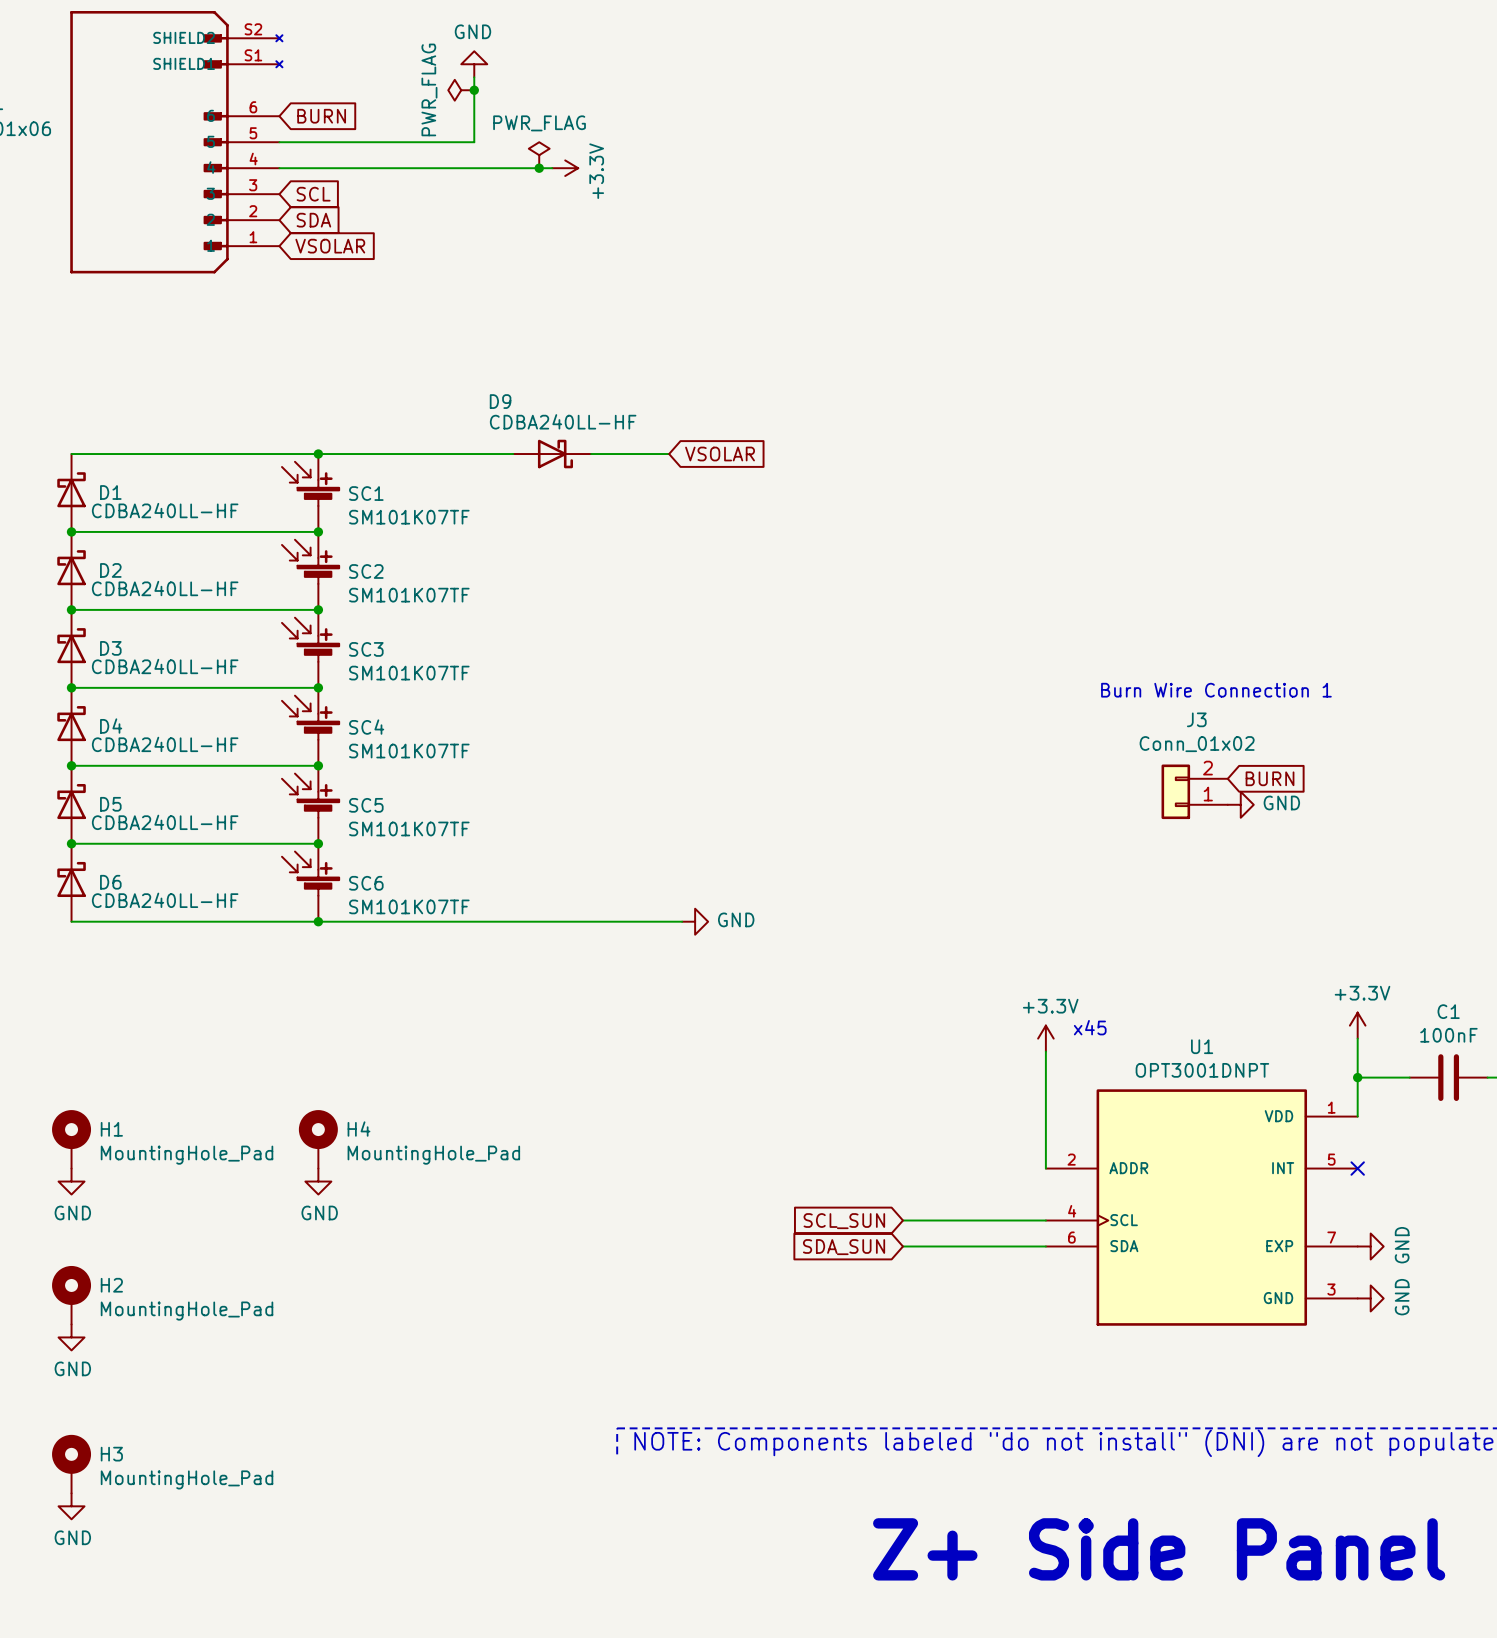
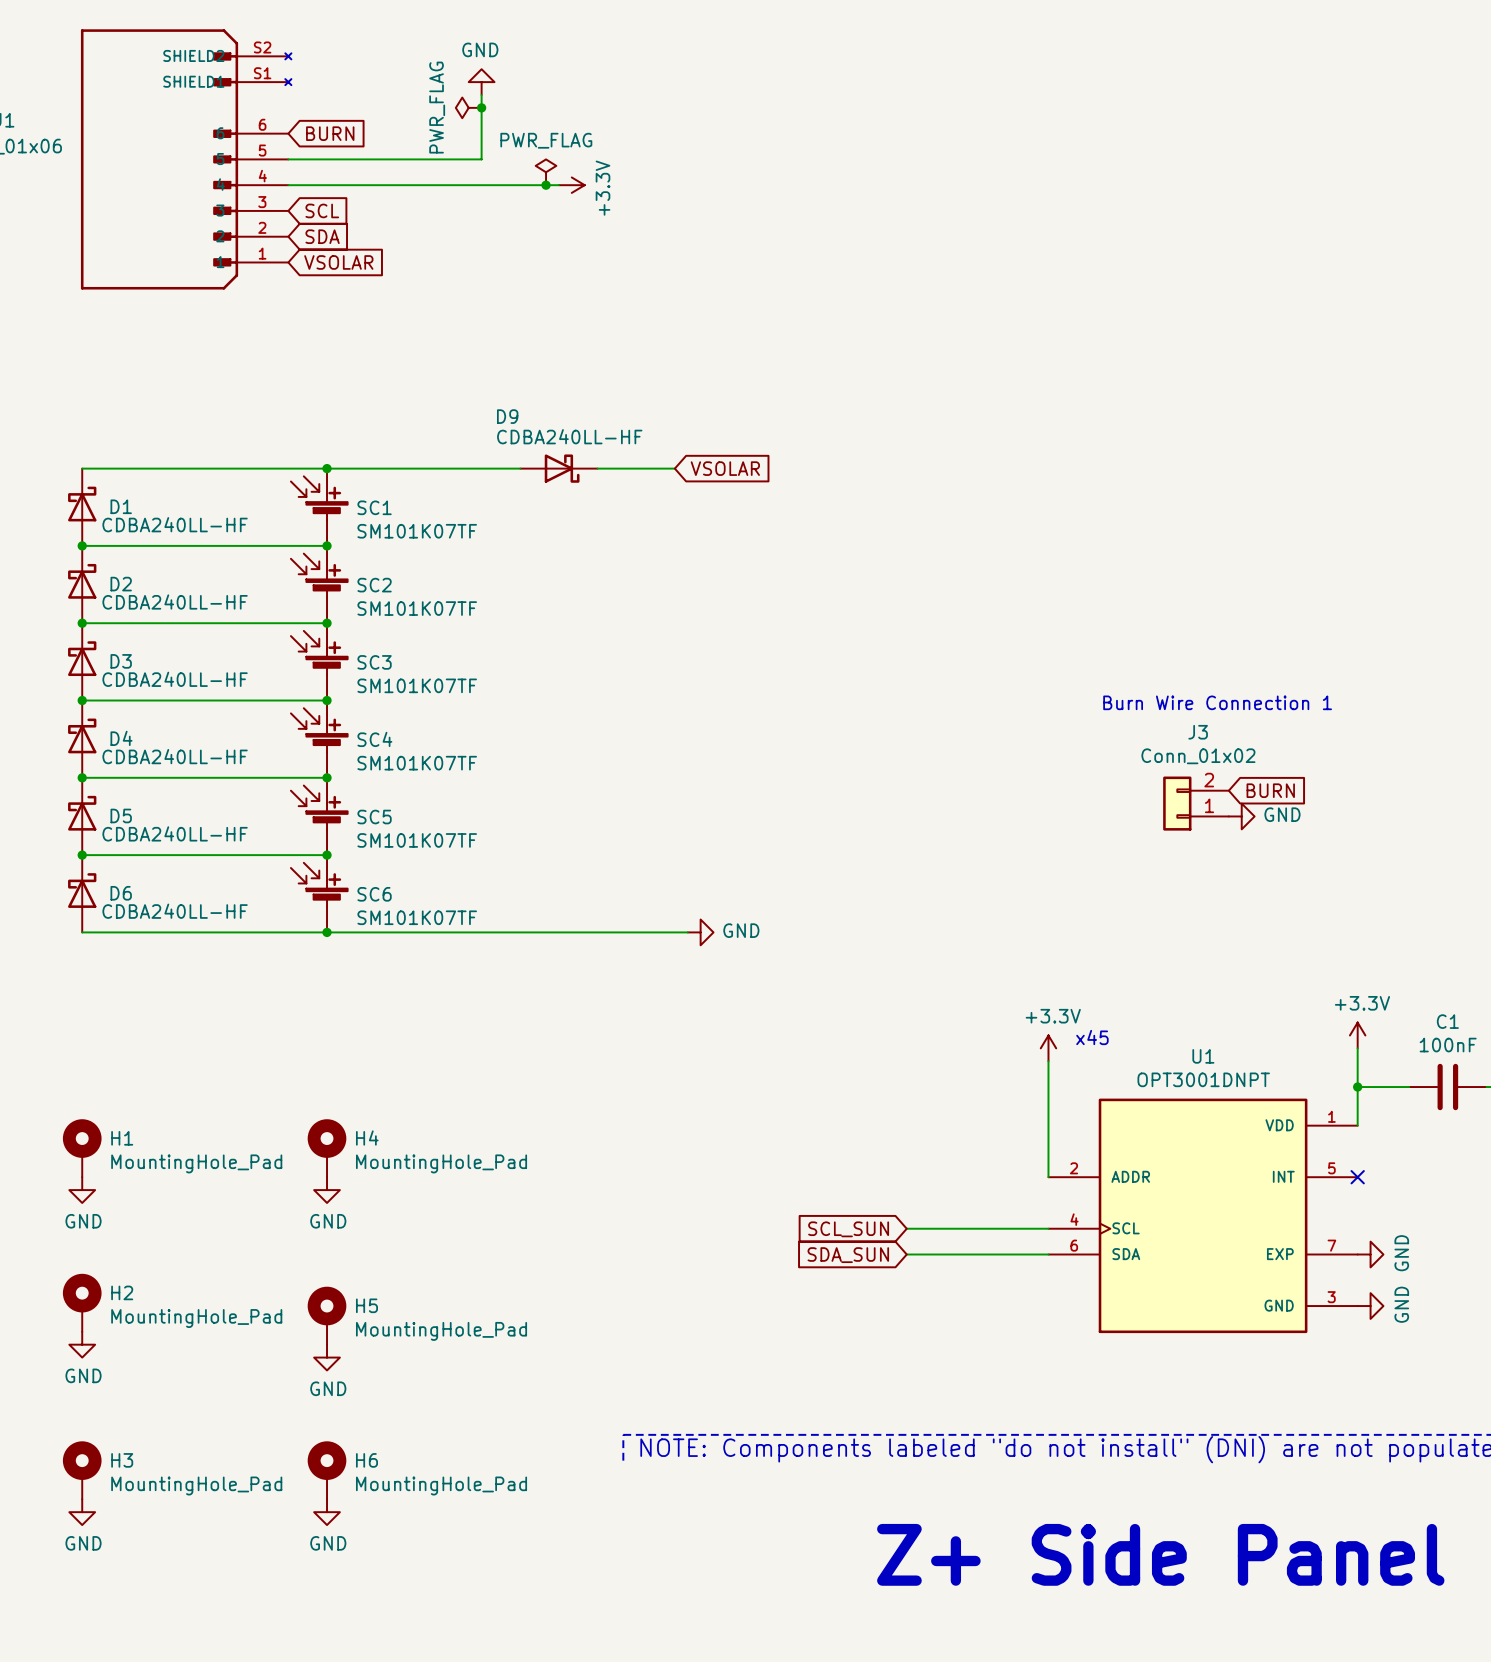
H5: none -> MountingHole_Pad (327, 1315)
power symbol: none -> GND (327, 1357)
H6: none -> MountingHole_Pad (327, 1470)
power symbol: none -> GND (327, 1512)

